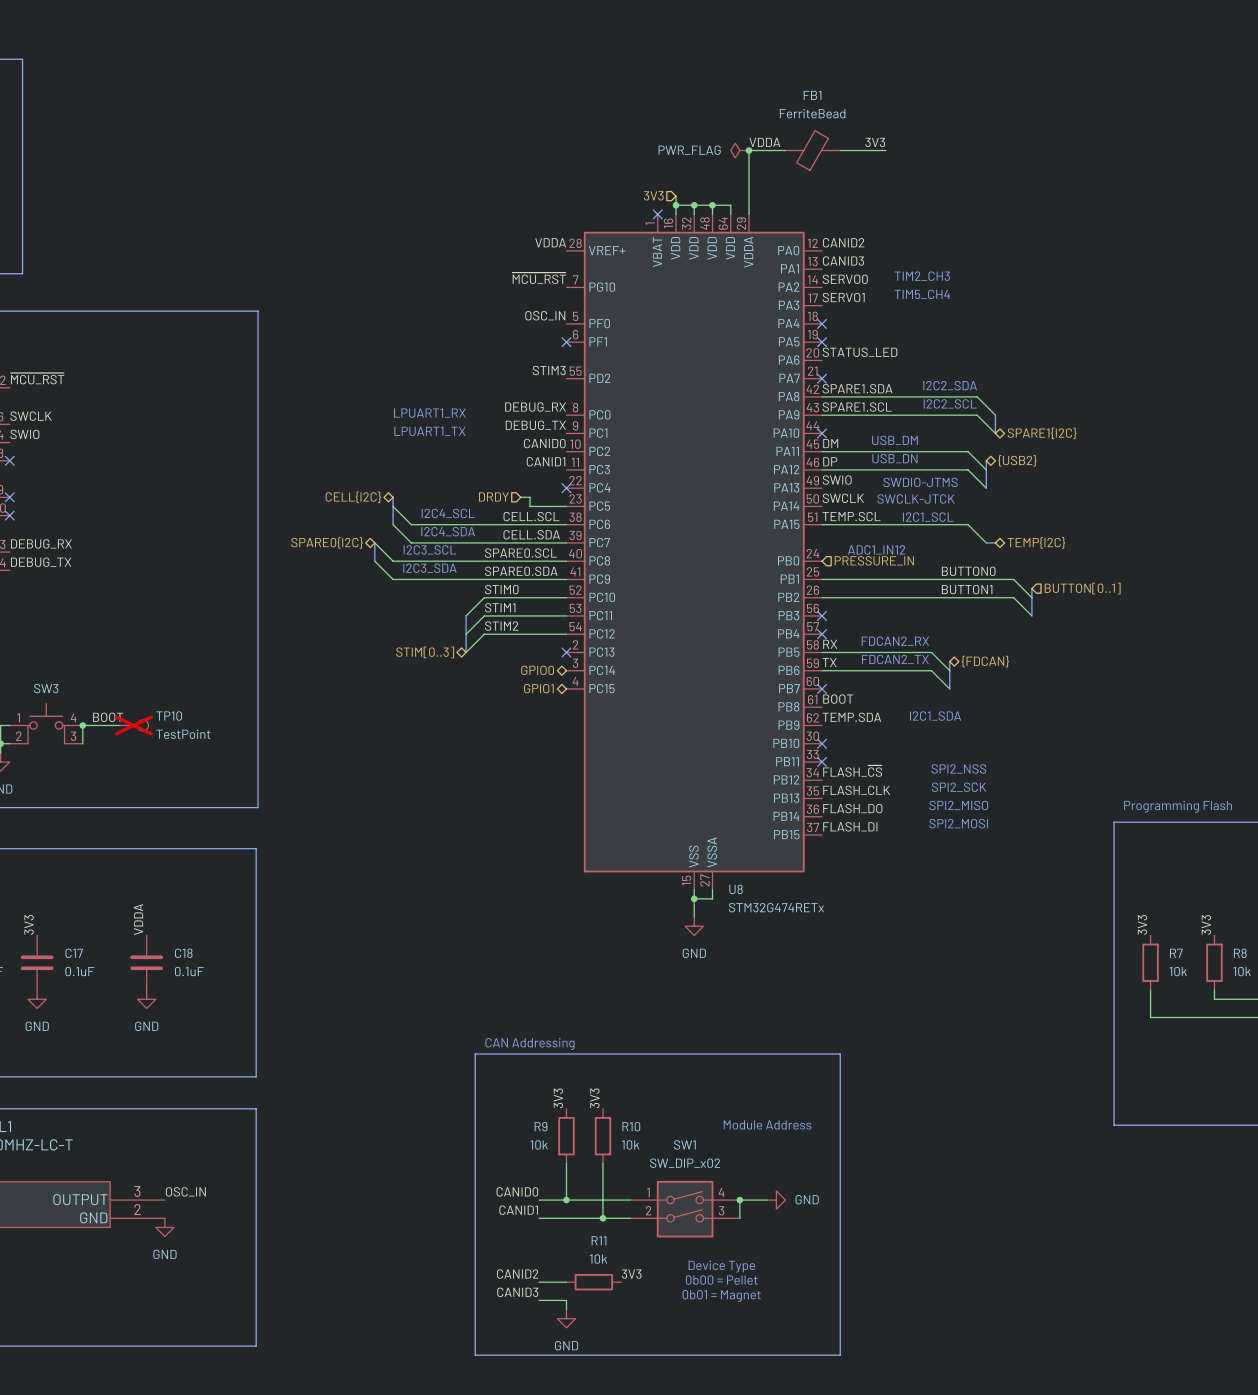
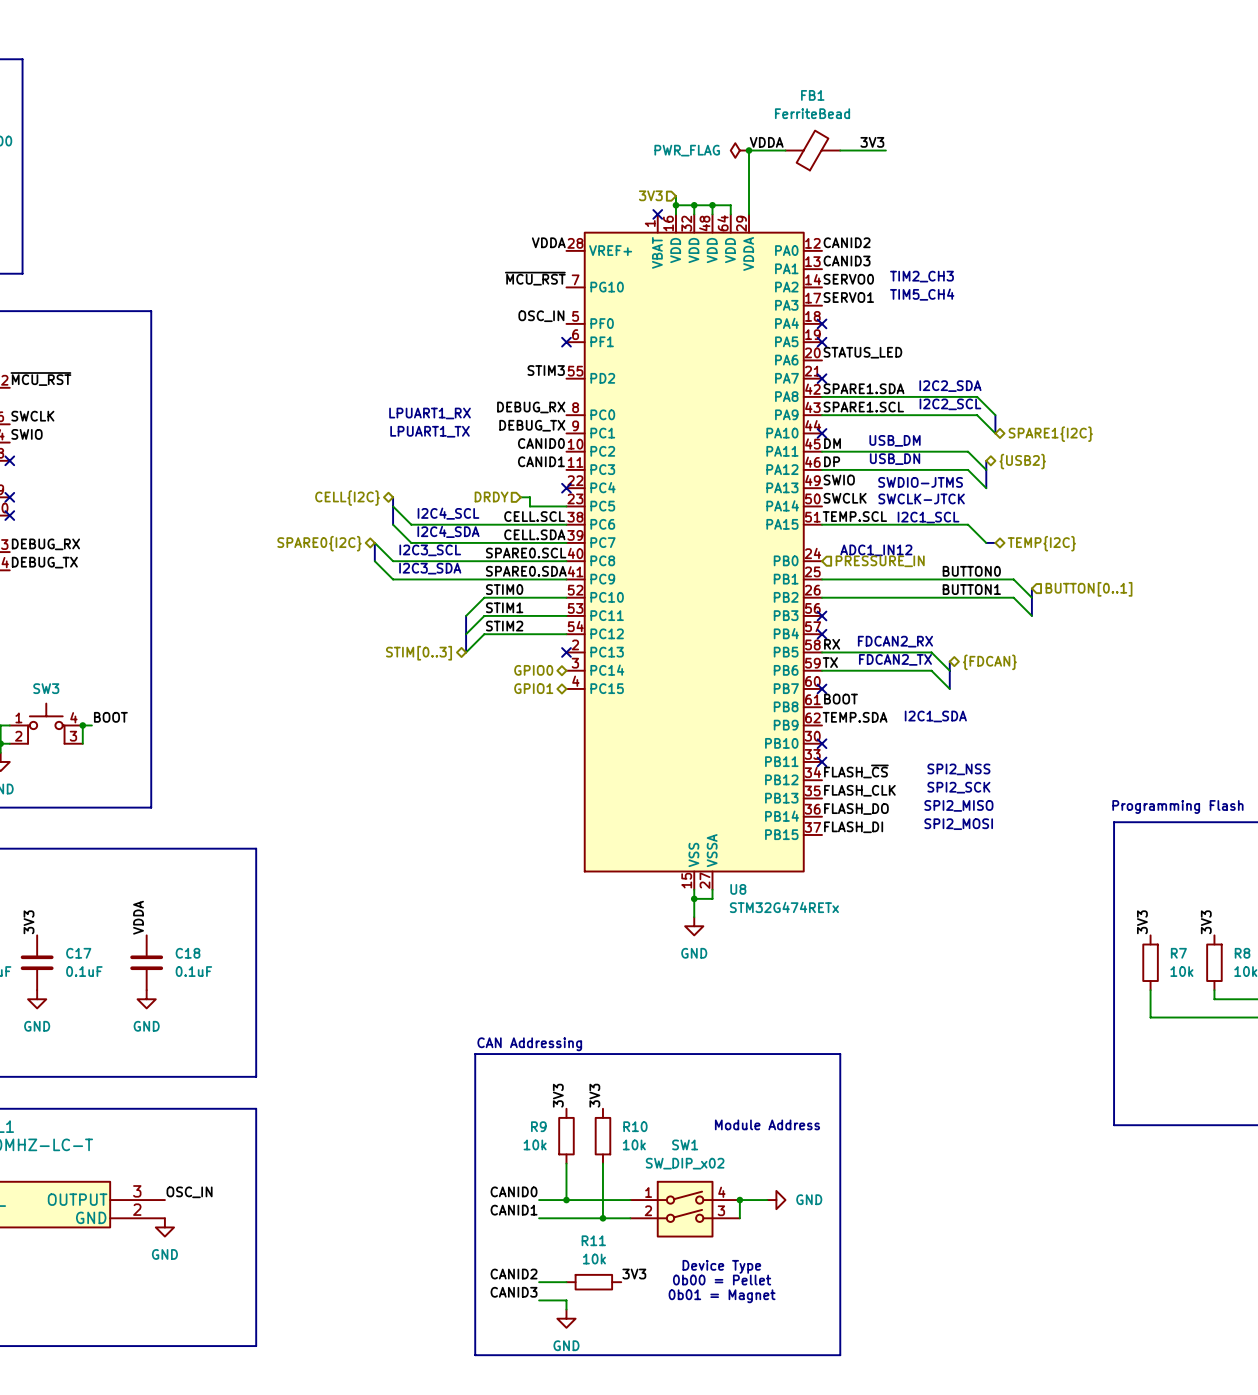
line: (151, 311) (258, 311) (258, 807) (151, 807) -> (151, 311) (151, 807)
wire: (91, 725) (119, 725) -> none
TP10: TestPoint (133, 725) -> none

